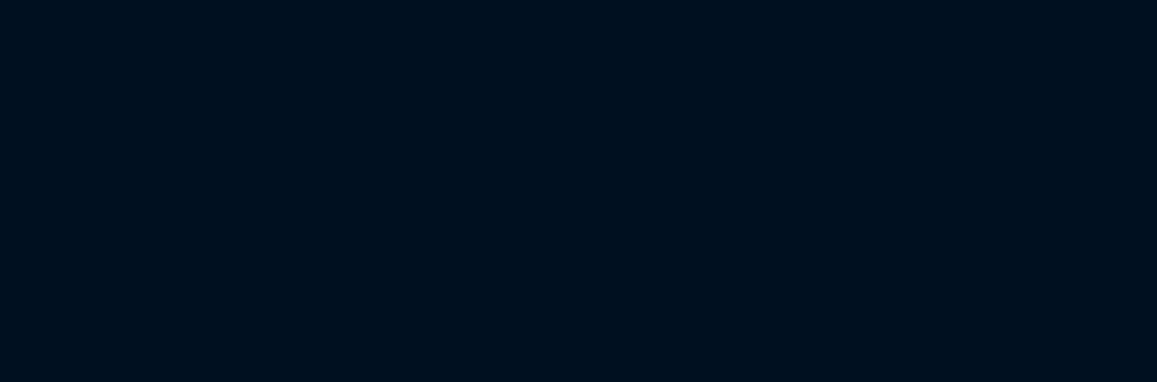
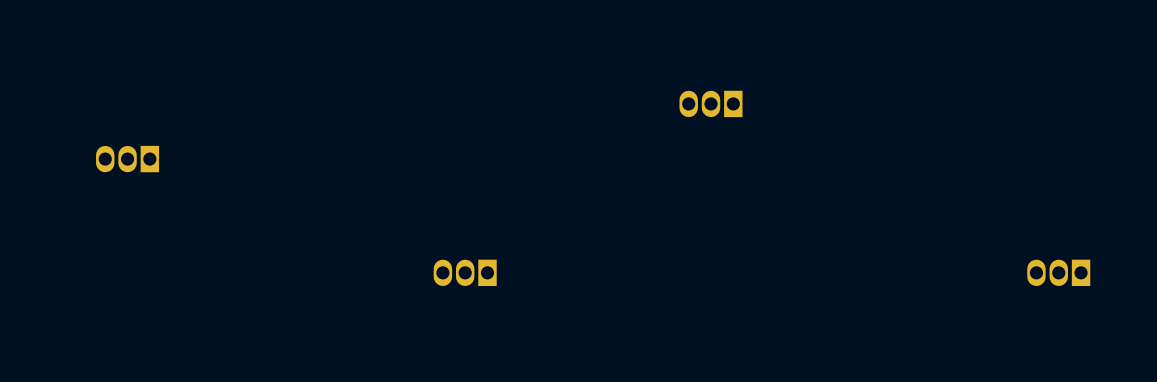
part: none -> (711, 103)
part: none -> (127, 159)
part: none -> (465, 272)
part: none -> (1058, 272)

